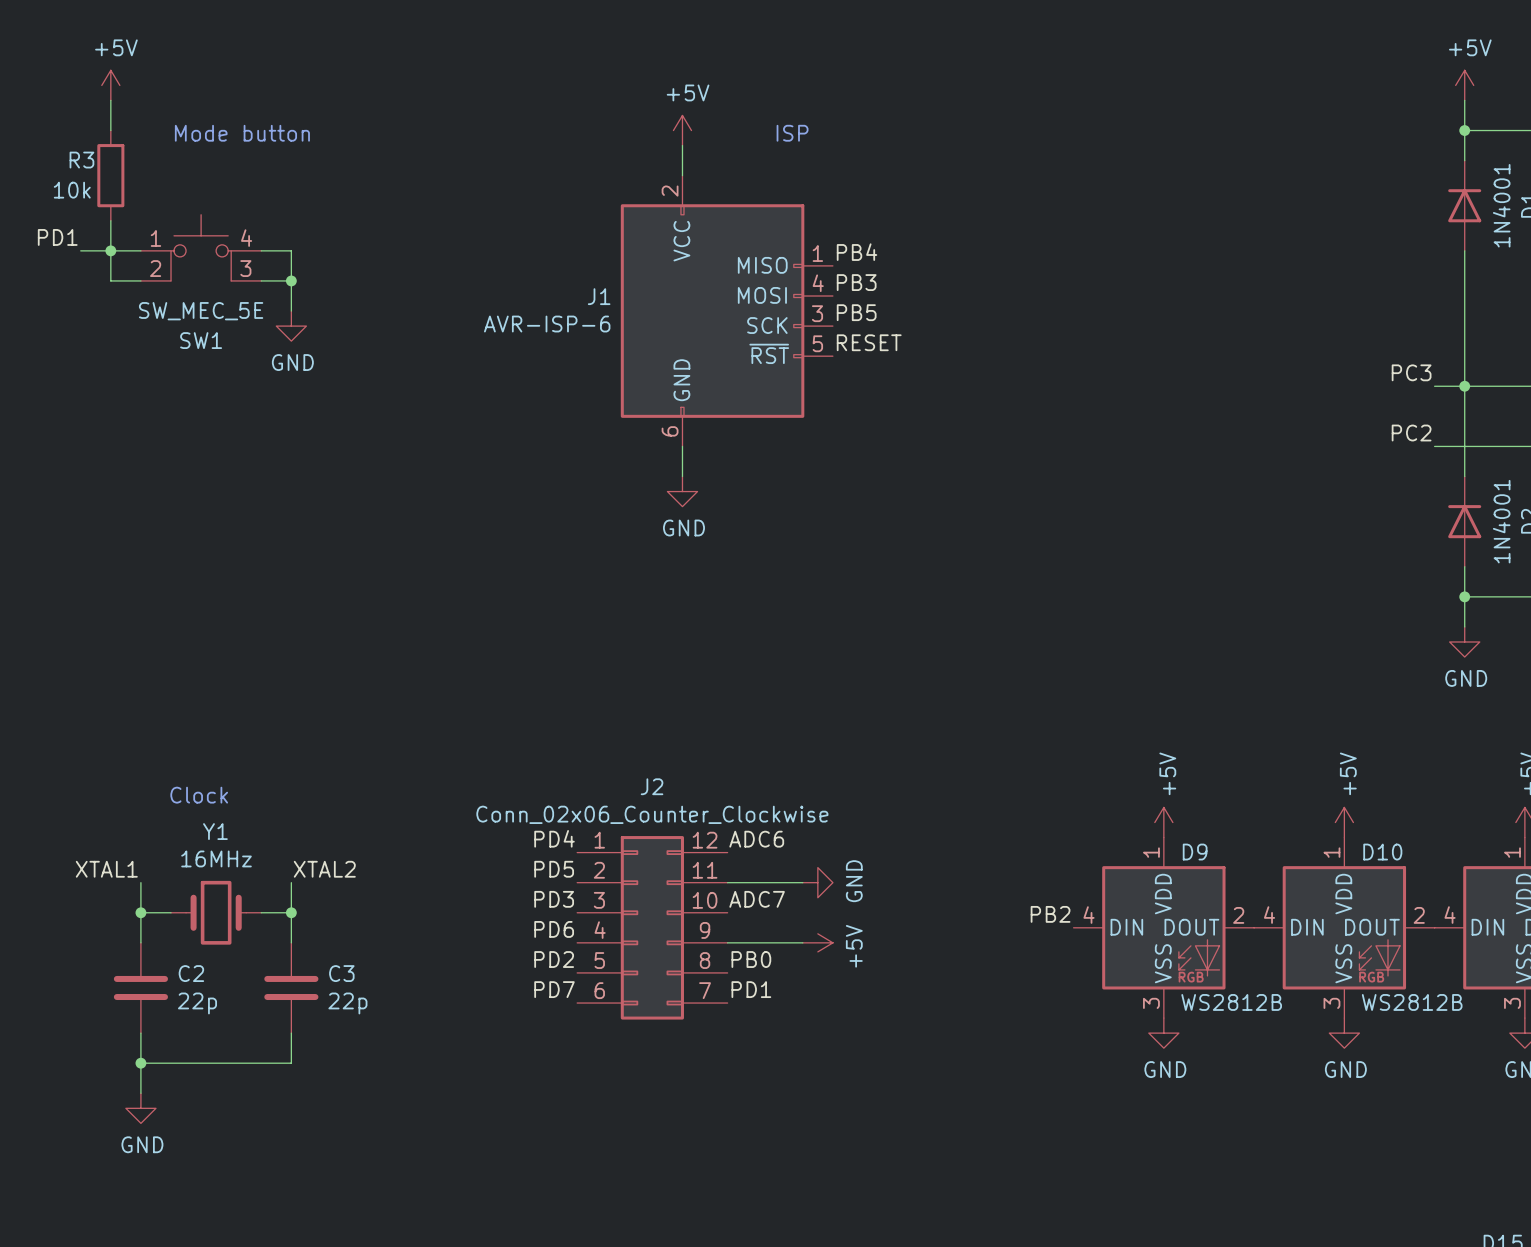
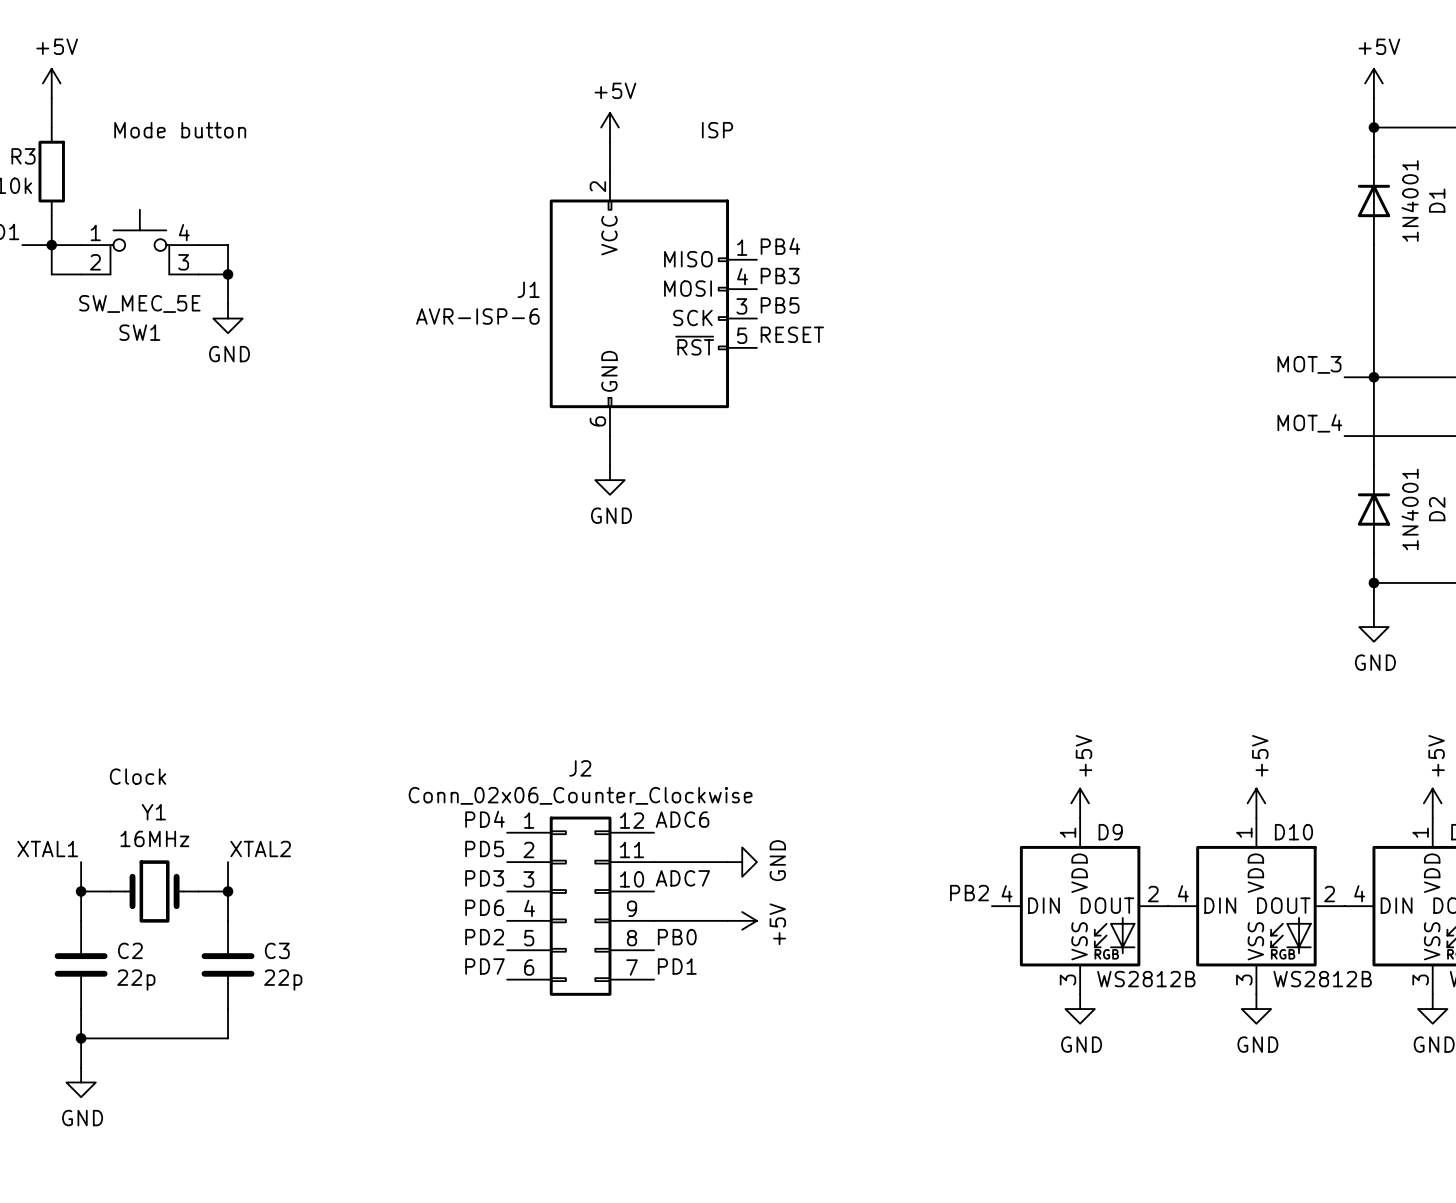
label: PC3 (1411, 372) -> MOT_3 (1309, 364)
label: PC2 (1411, 433) -> MOT_4 (1309, 423)

